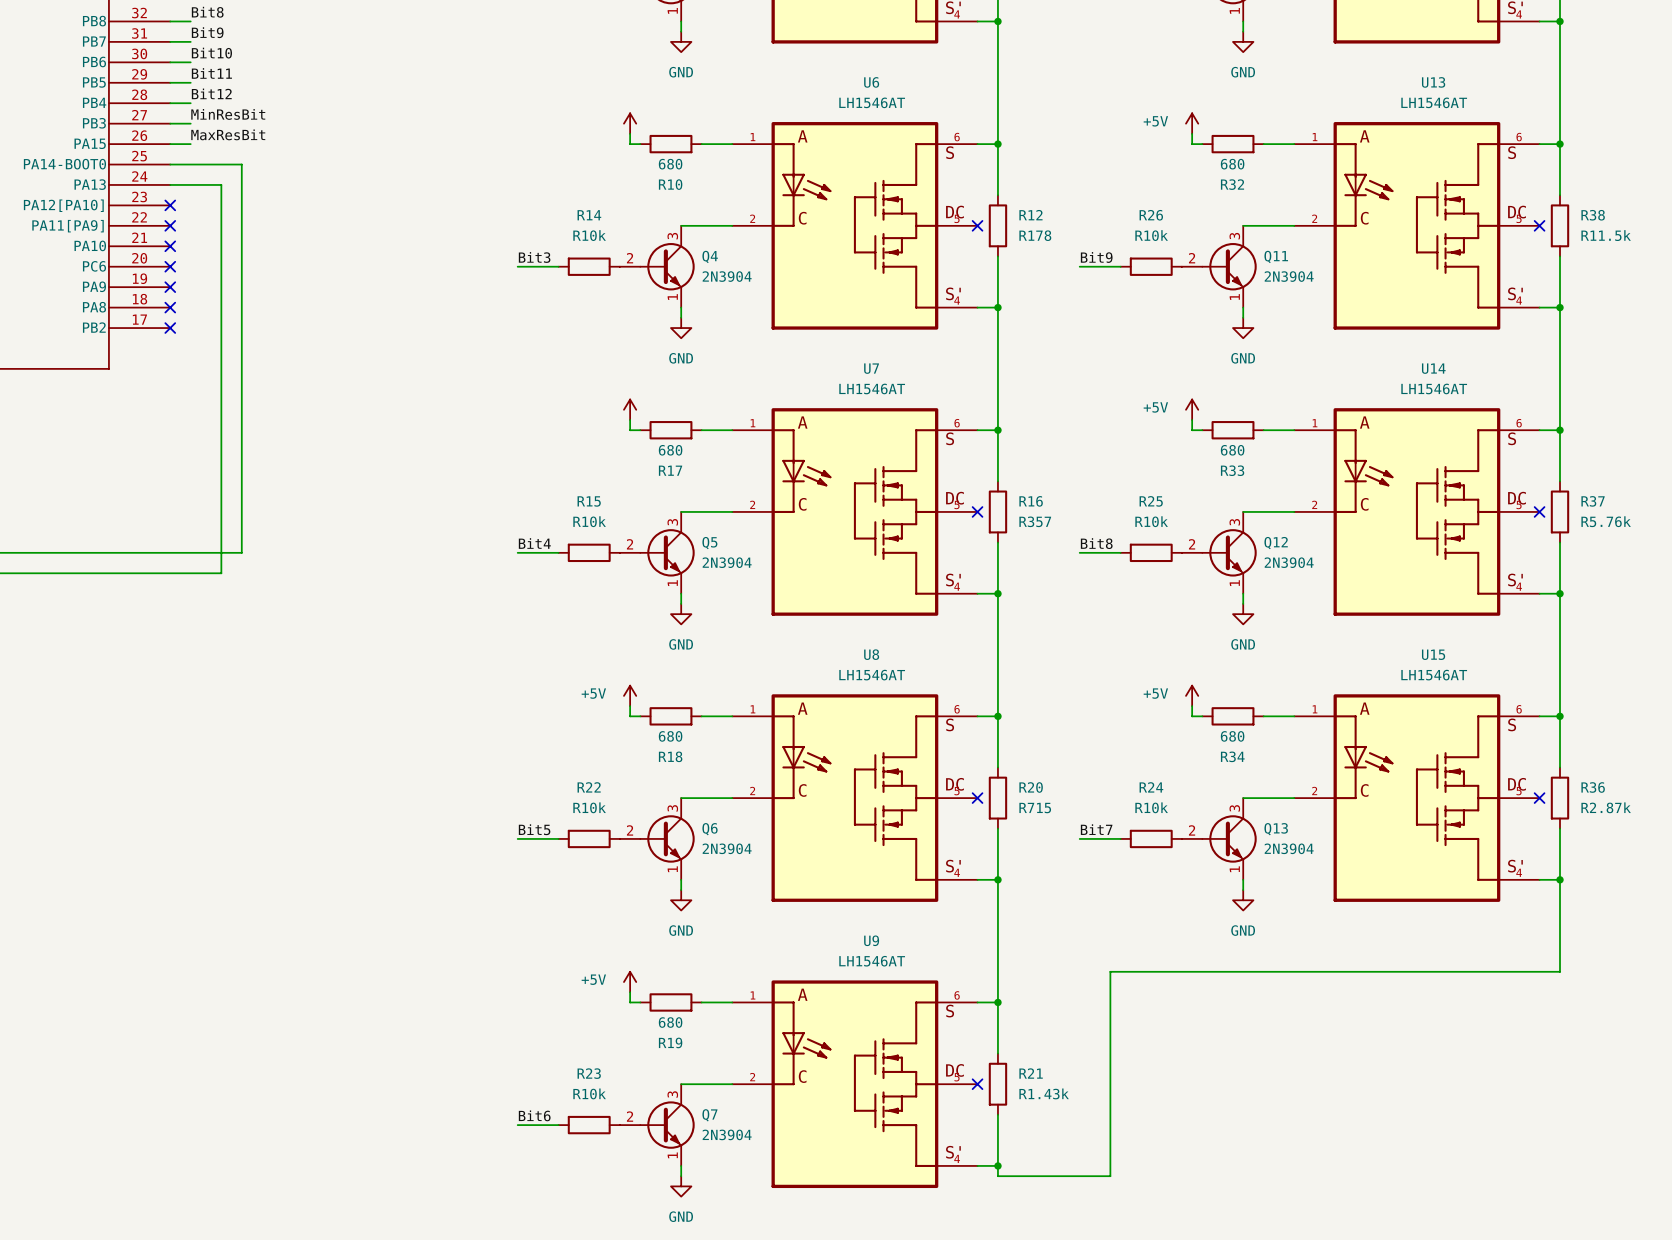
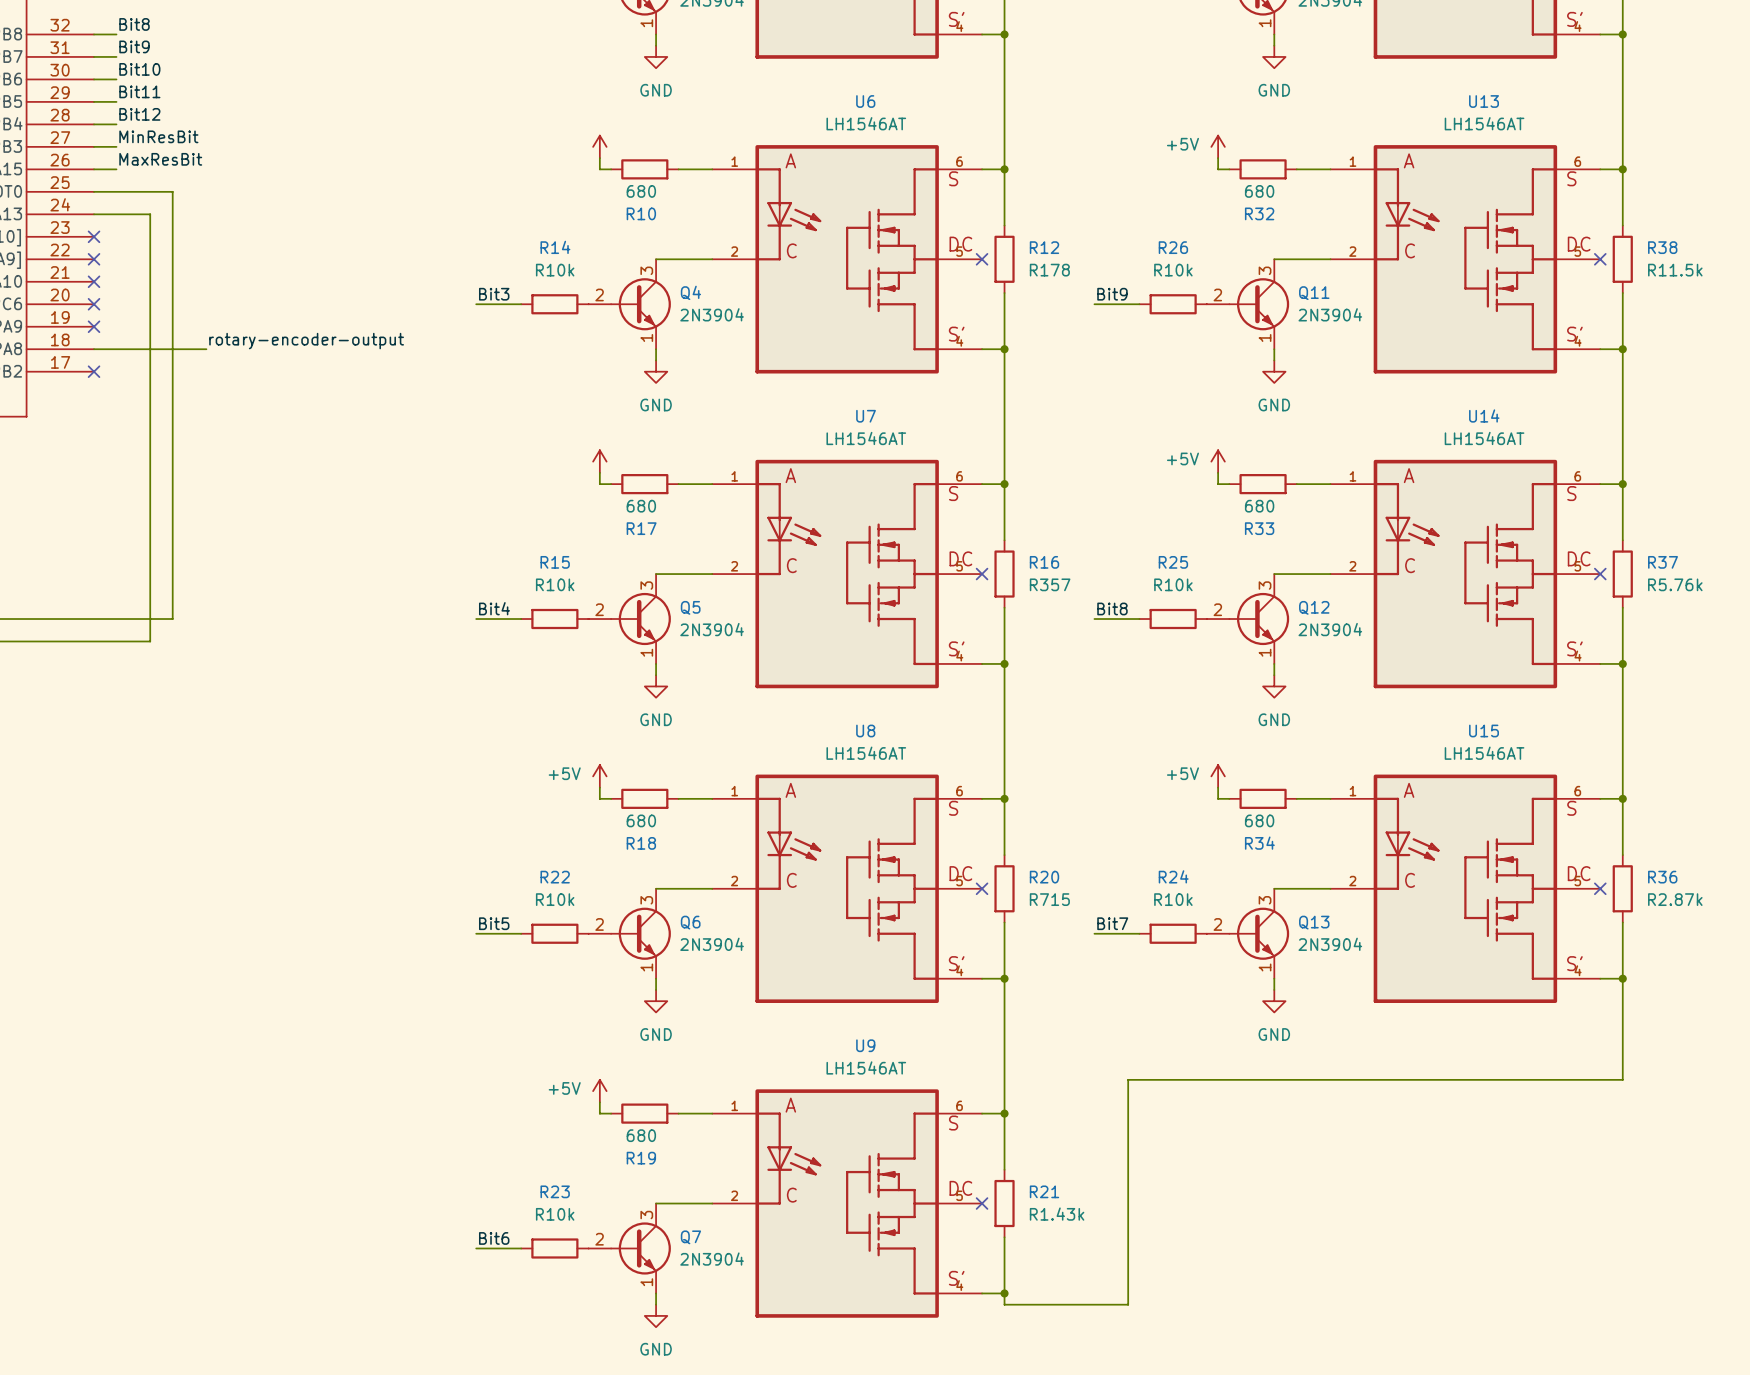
label: none -> rotary-encoder-output (306, 341)
wire: none -> (94, 349) (206, 349)
no-connect mark: (170, 307) -> none

